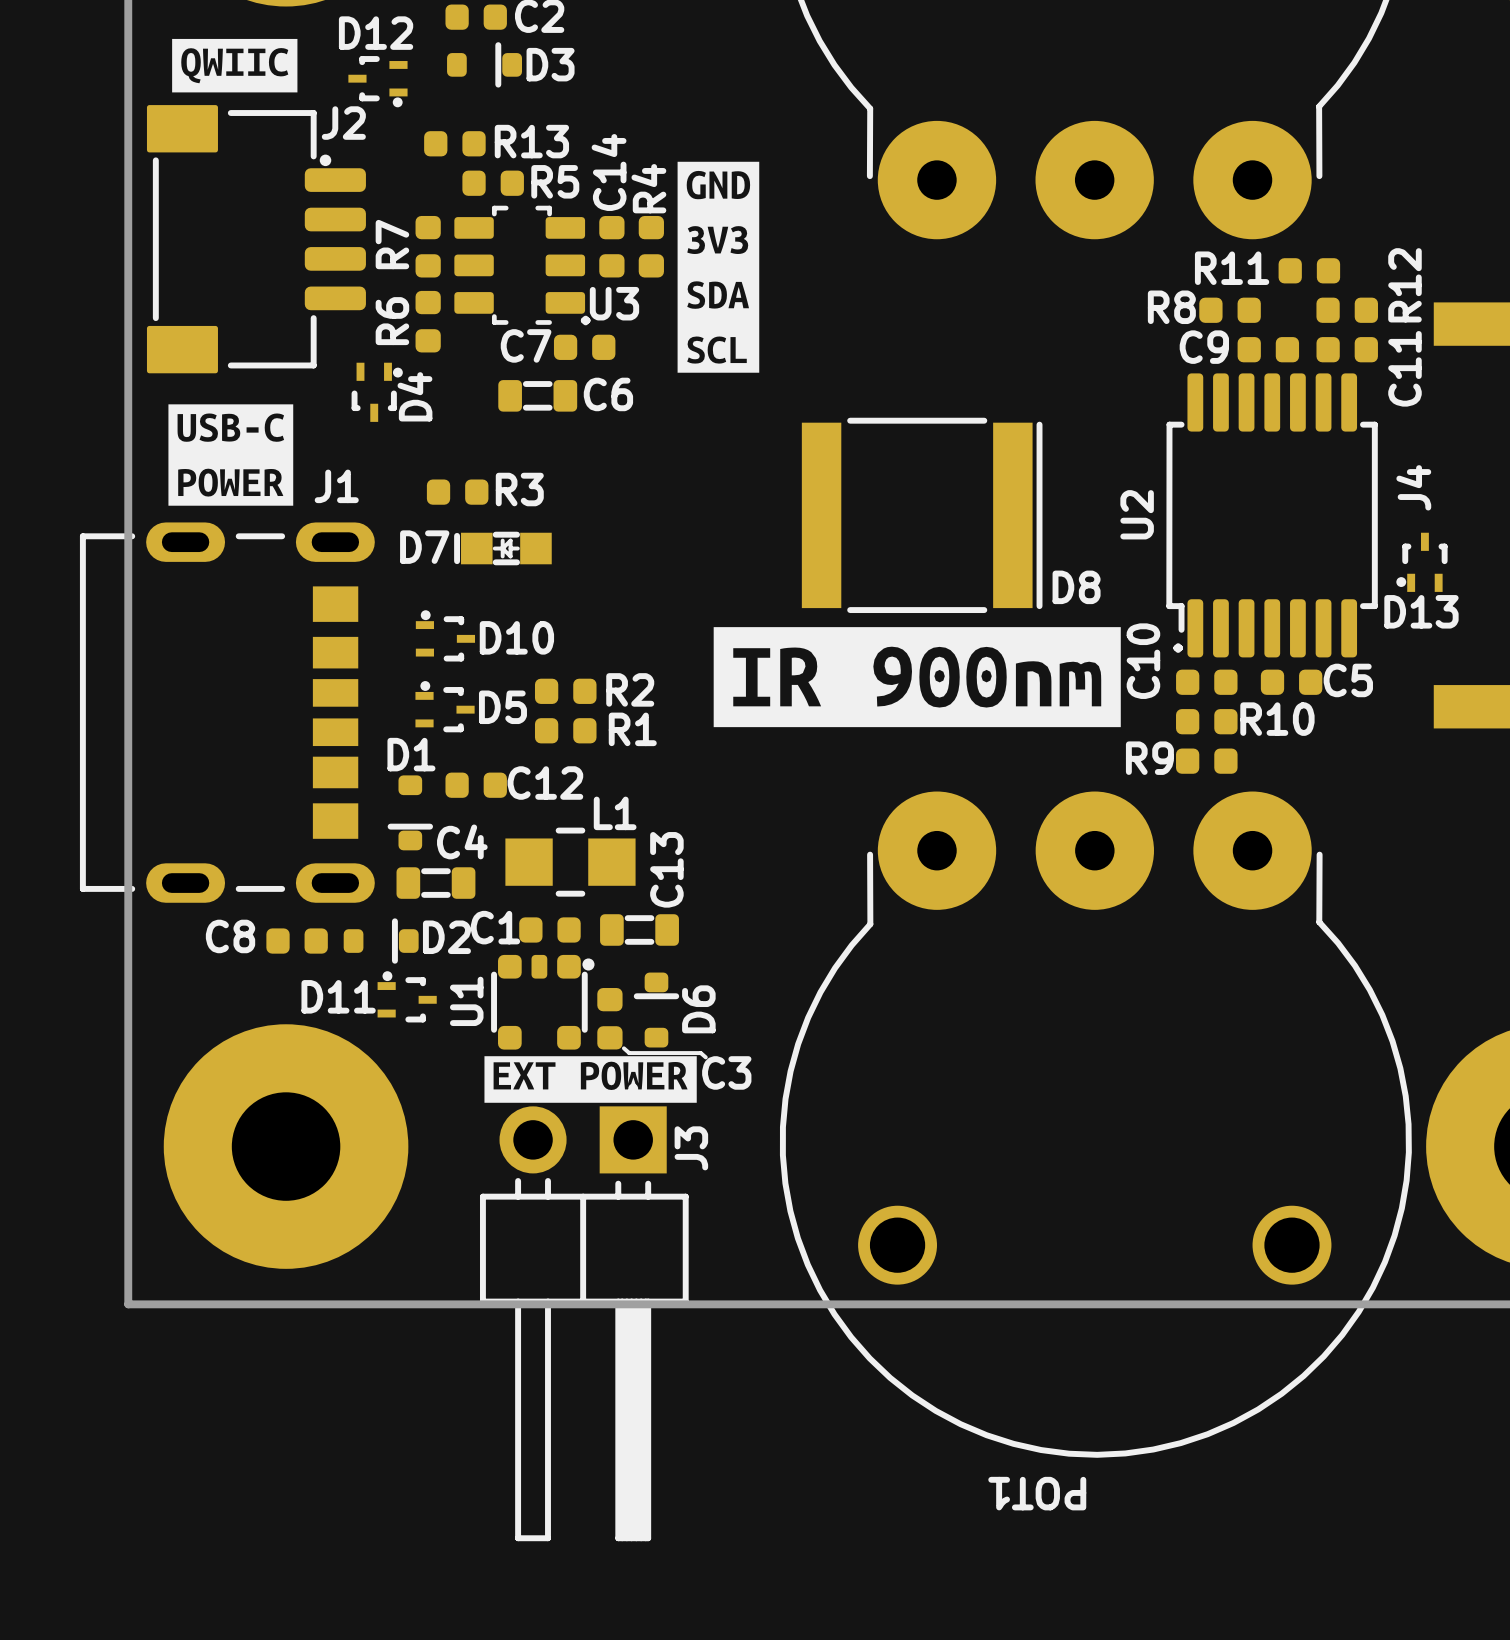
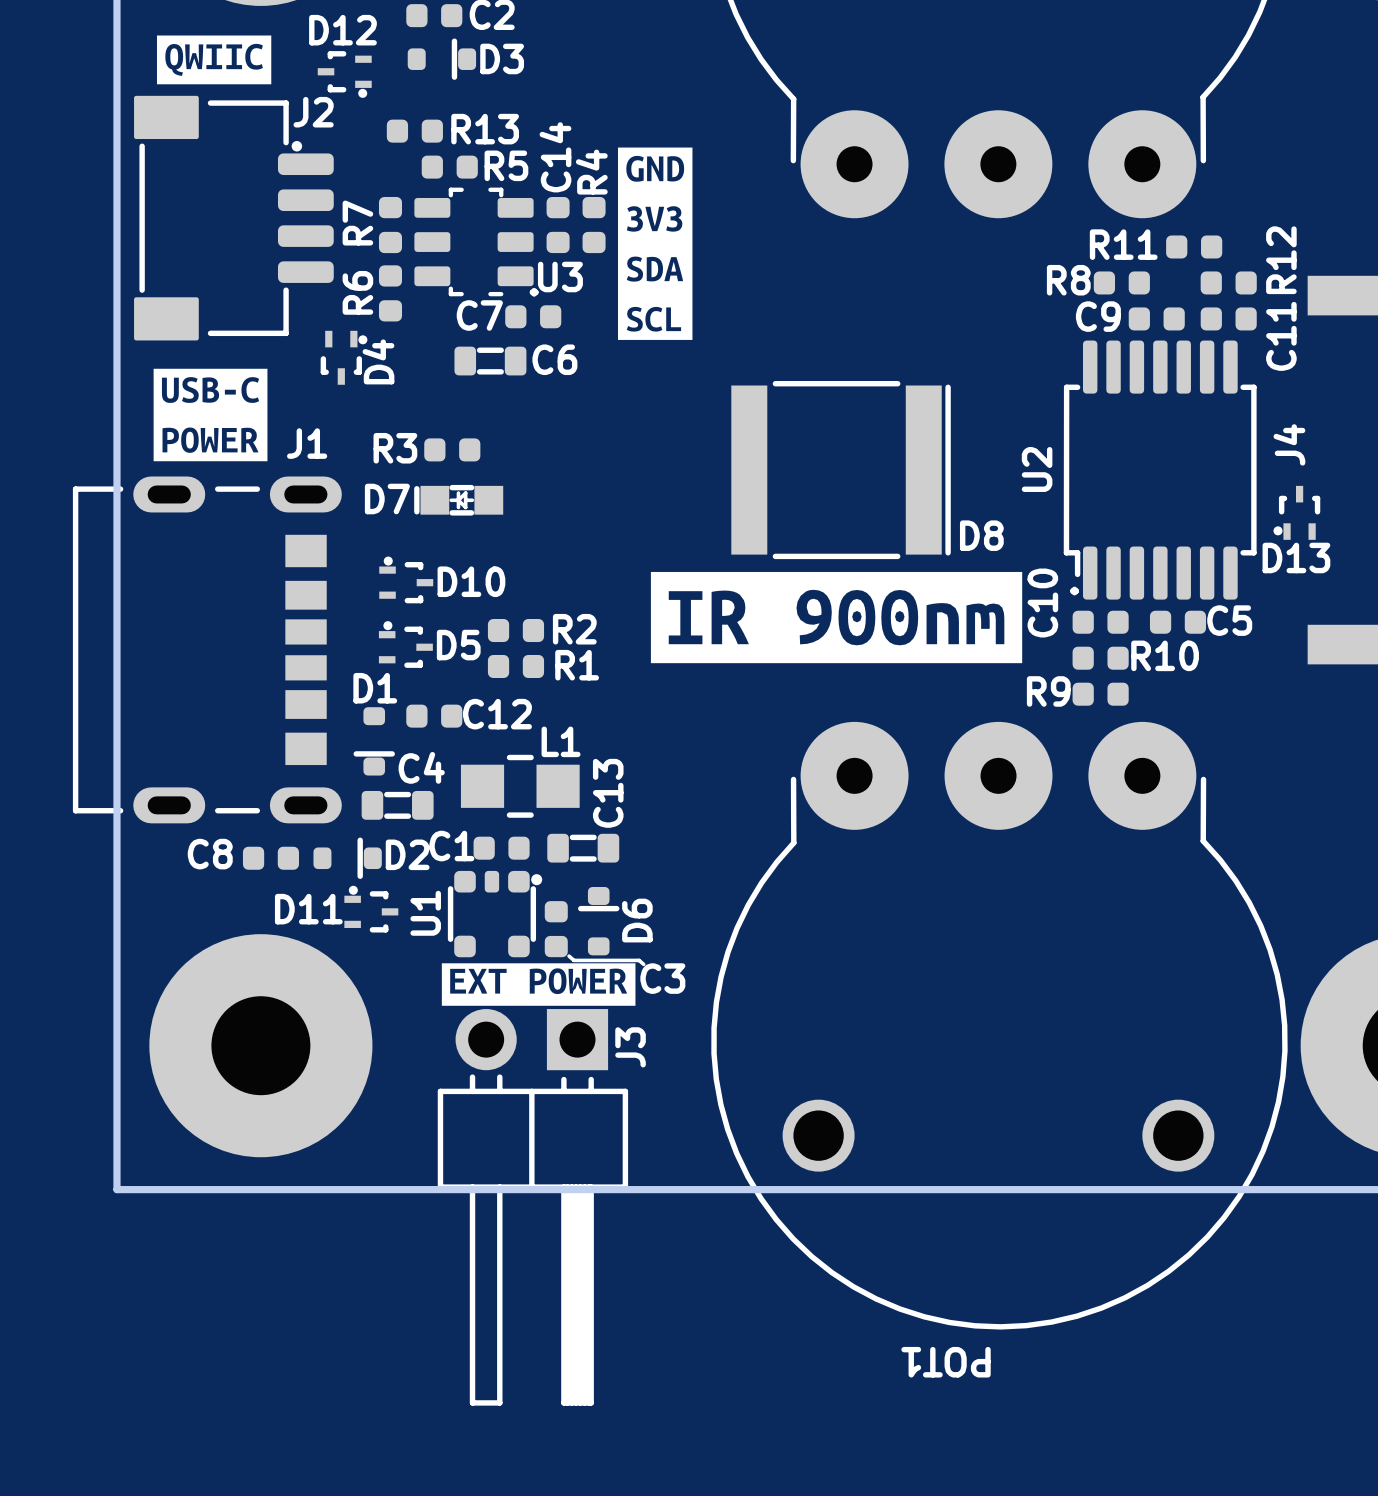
R3 name position: R3 (519, 489) -> R3 (395, 448)
R3 position: (457, 492) -> (452, 449)

